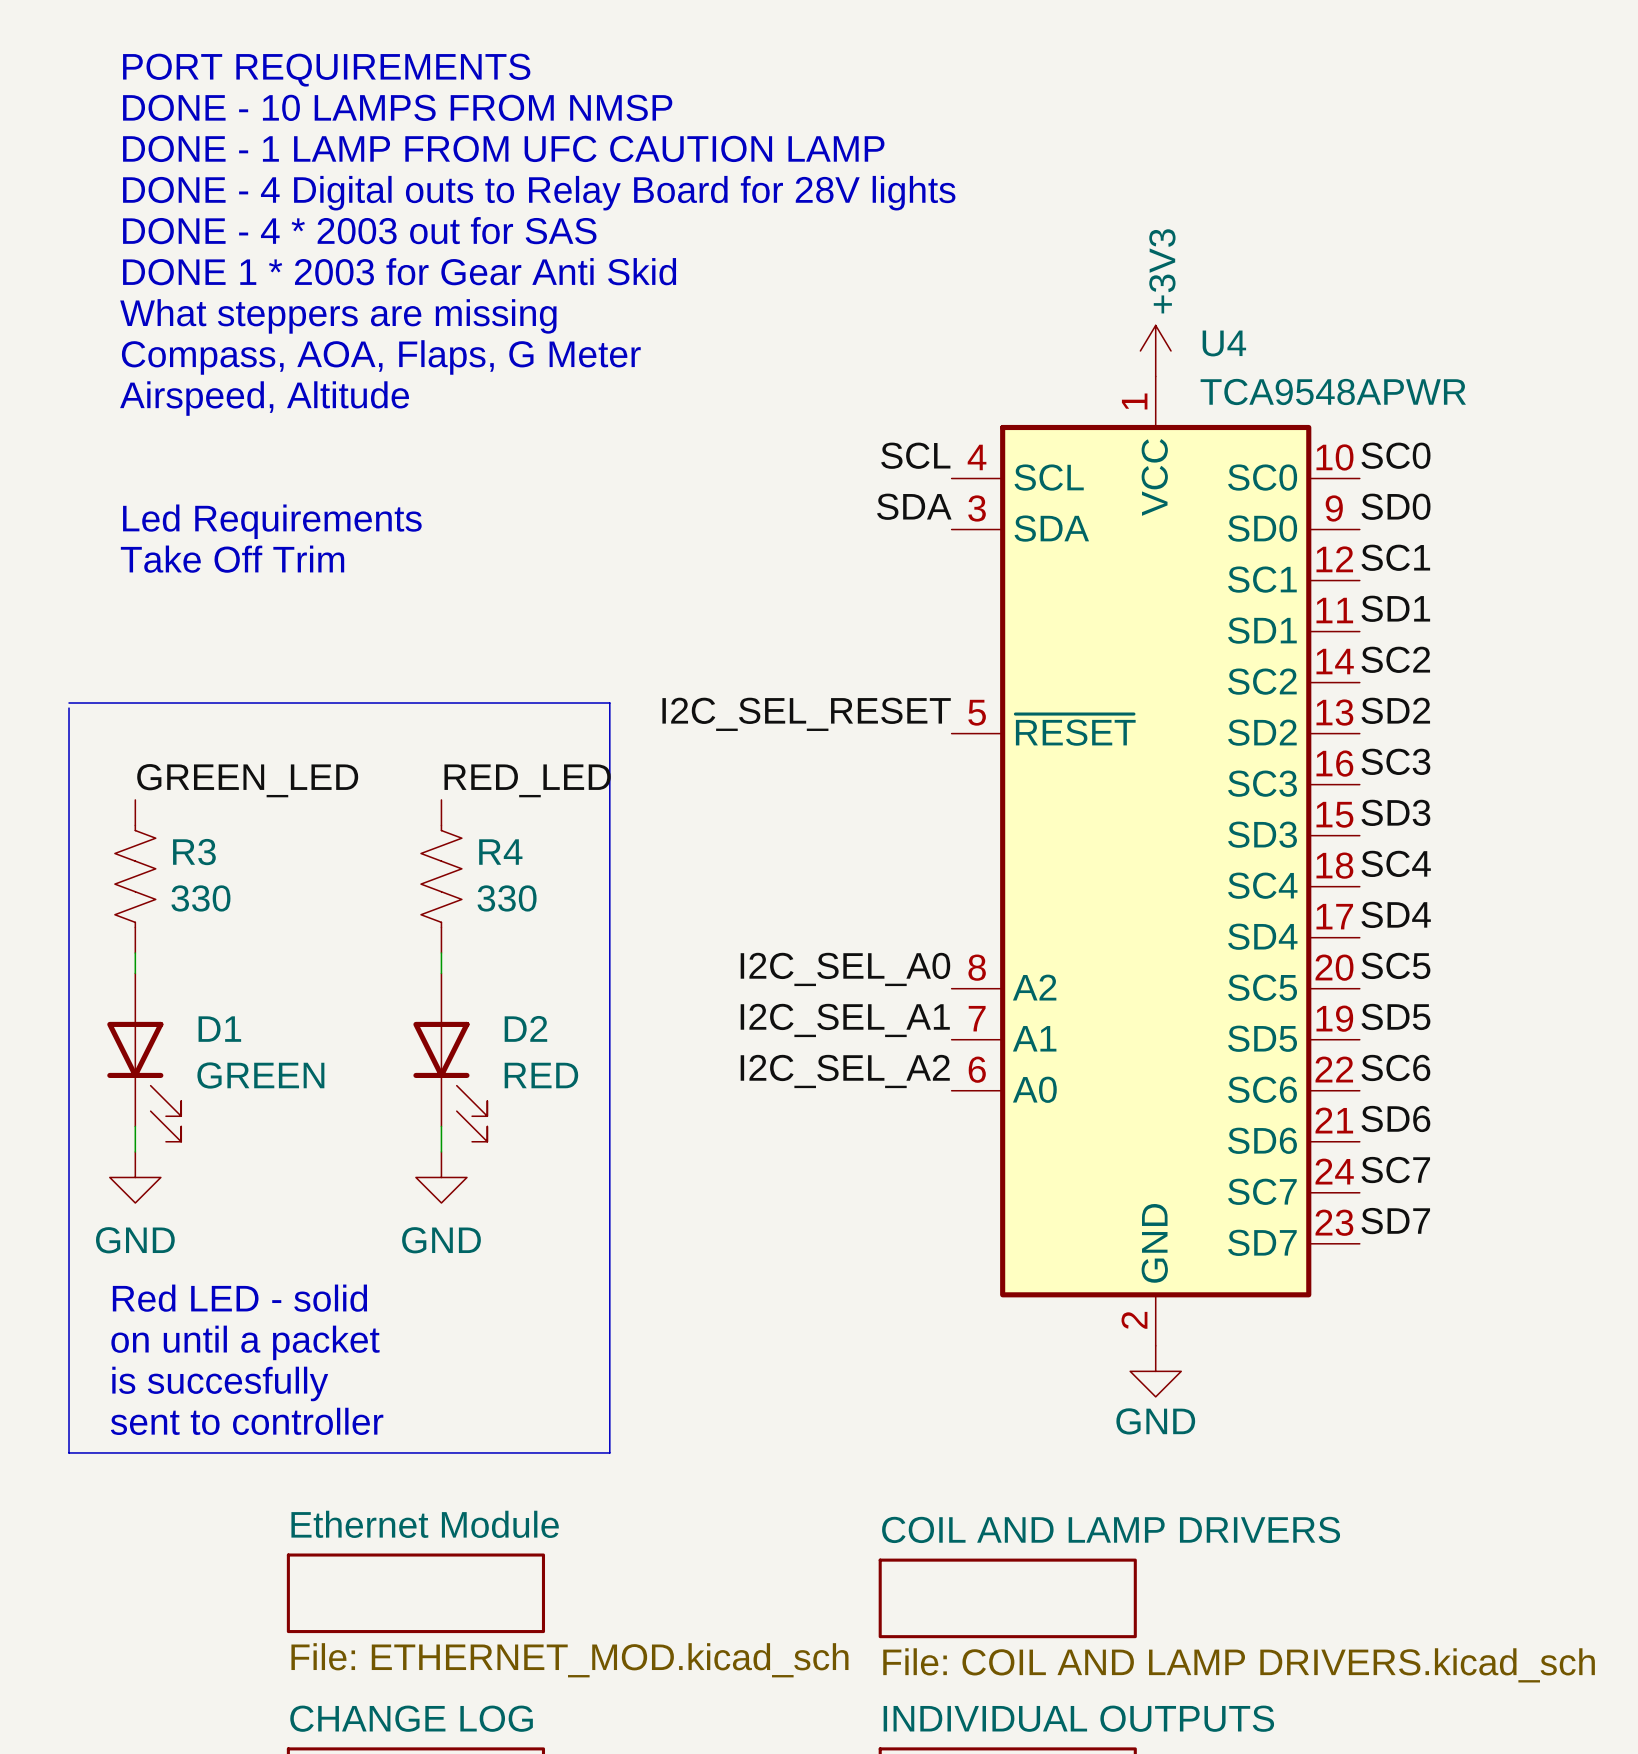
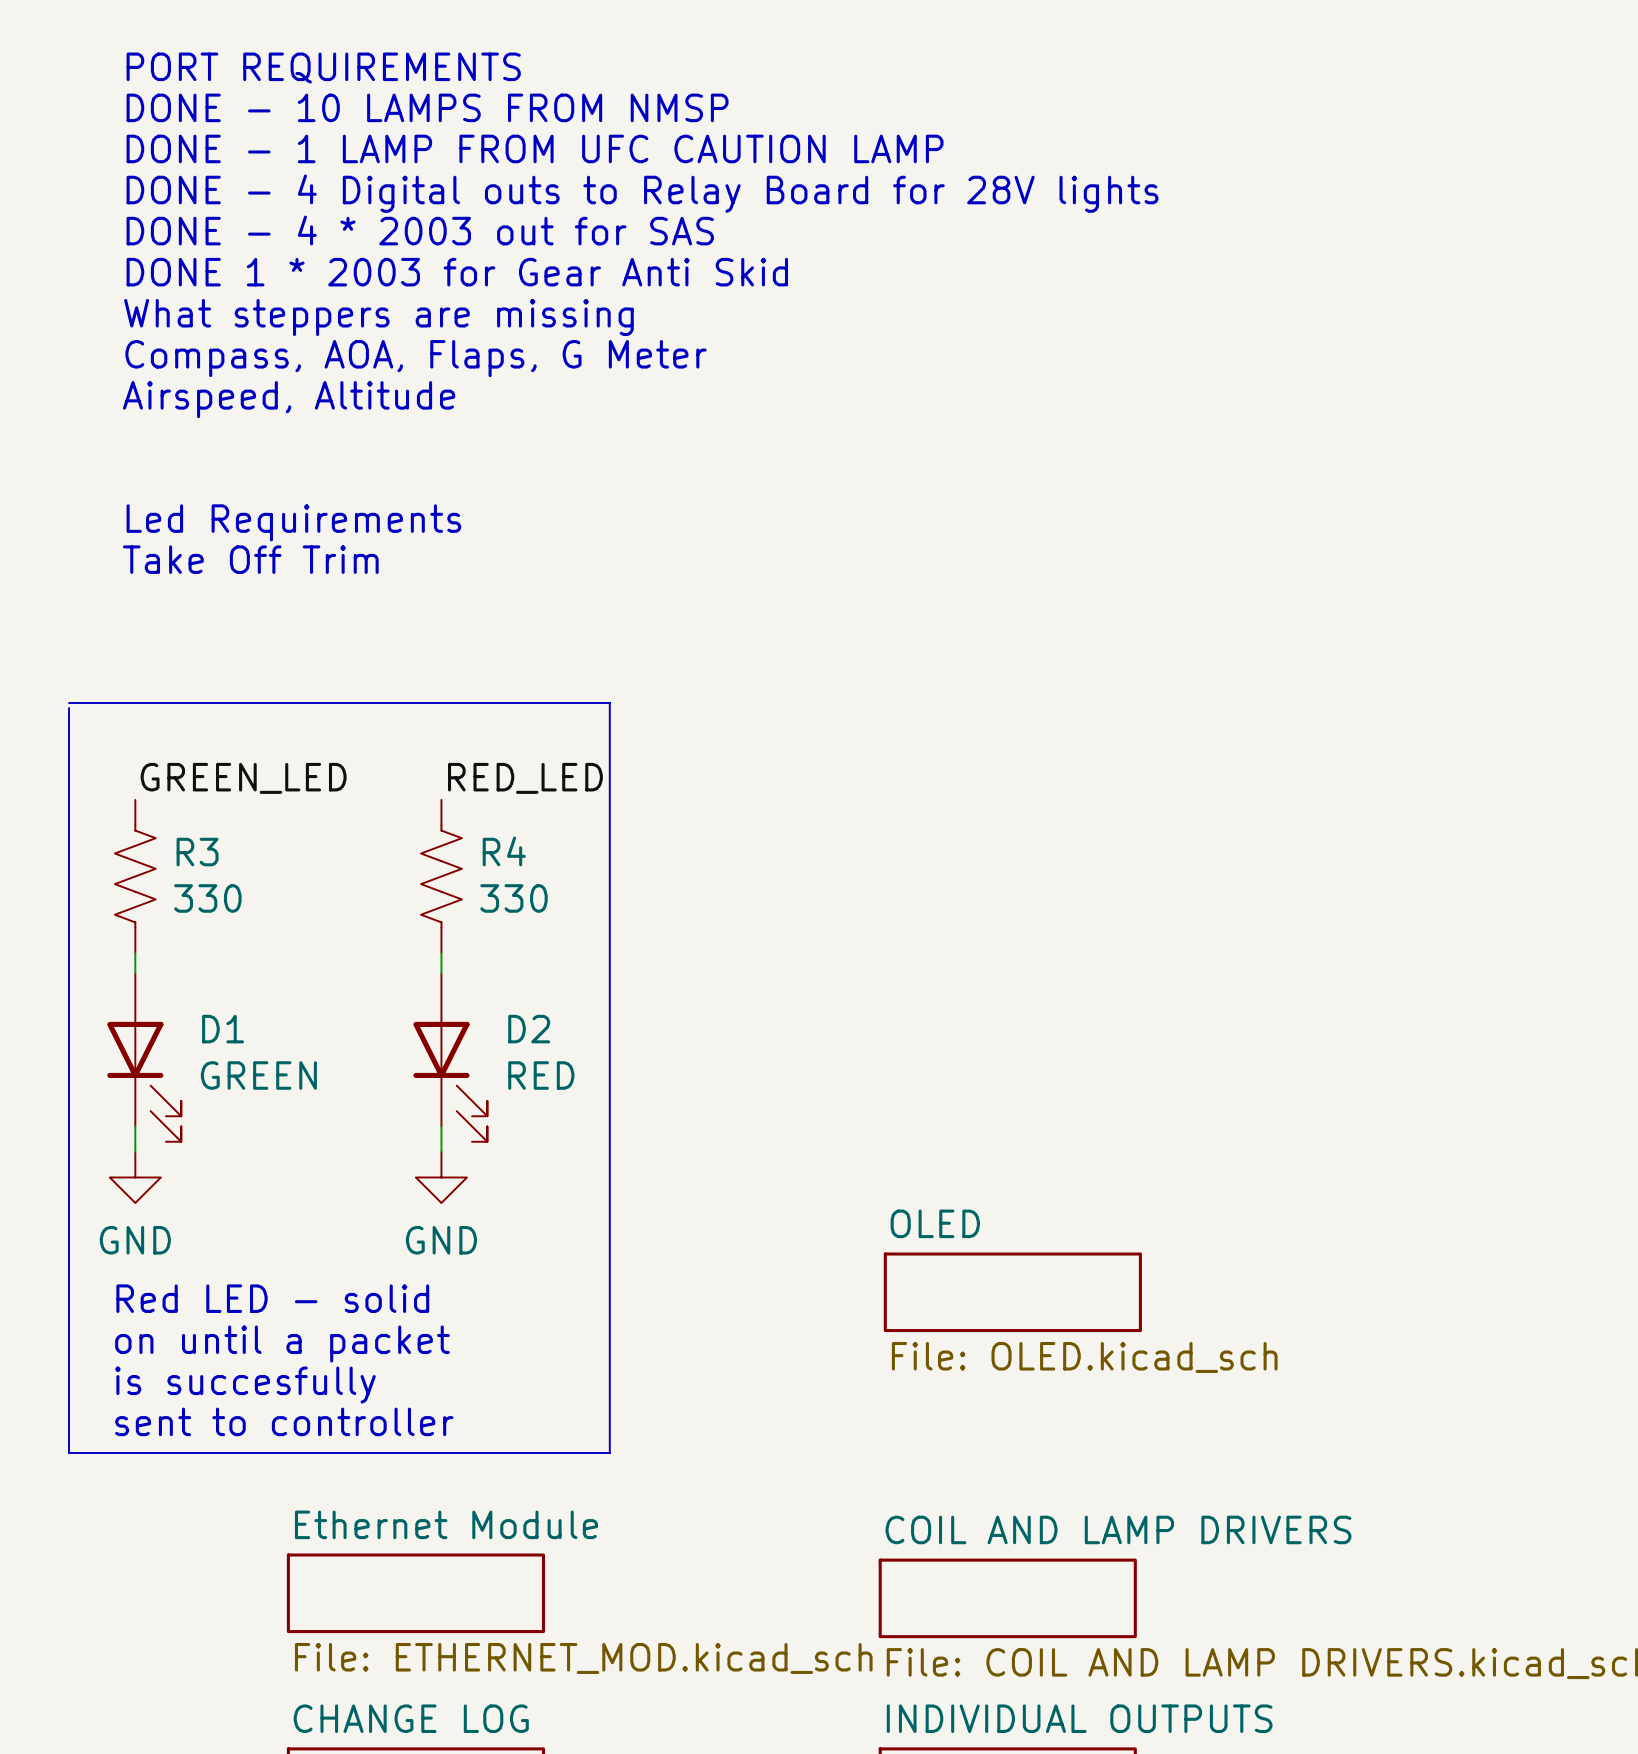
power symbol: +3V3 (1155, 350) -> none
label: SCL (915, 455) -> none
label: SC0 (1395, 455) -> none
label: SDA (914, 506) -> none
label: SD0 (1395, 506) -> none
label: SC1 (1395, 557) -> none
label: SD1 (1395, 608) -> none
label: SC2 (1395, 659) -> none
label: SD2 (1395, 710) -> none
label: I2C_SEL_RESET (806, 714) -> none
label: SC3 (1395, 761) -> none
label: SD3 (1395, 812) -> none
U4: TCA9548APWR (1155, 861) -> none
label: SC4 (1396, 863) -> none
label: SD4 (1396, 914) -> none
label: SC5 (1395, 965) -> none
label: I2C_SEL_A0 (845, 969) -> none
label: SD5 (1395, 1016) -> none
label: I2C_SEL_A1 (845, 1020) -> none
label: SC6 (1395, 1067) -> none
label: I2C_SEL_A2 (845, 1071) -> none
label: SD6 (1395, 1118) -> none
label: SC7 (1395, 1170) -> none
label: SD7 (1395, 1221) -> none
sheet OLED: none -> File: OLED.kicad_sch (1012, 1292)
power symbol: GND (1155, 1371) -> none

